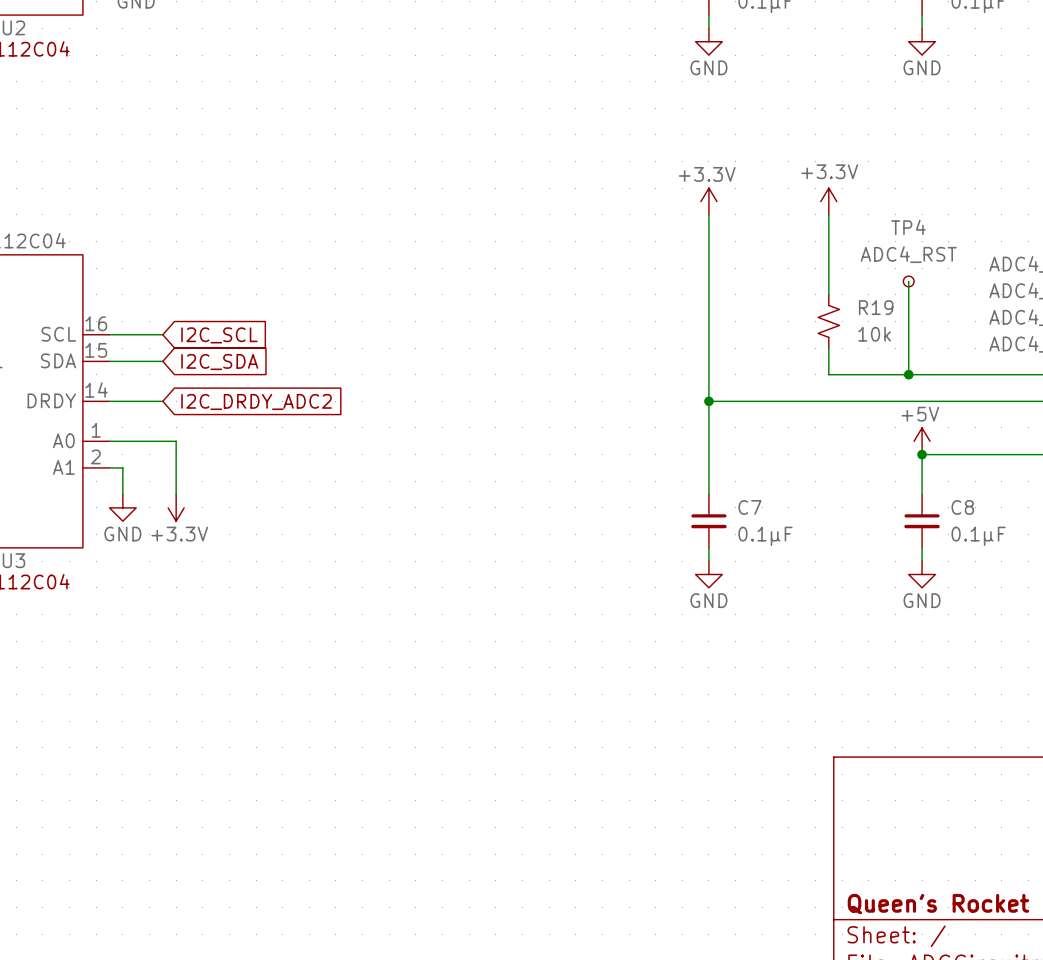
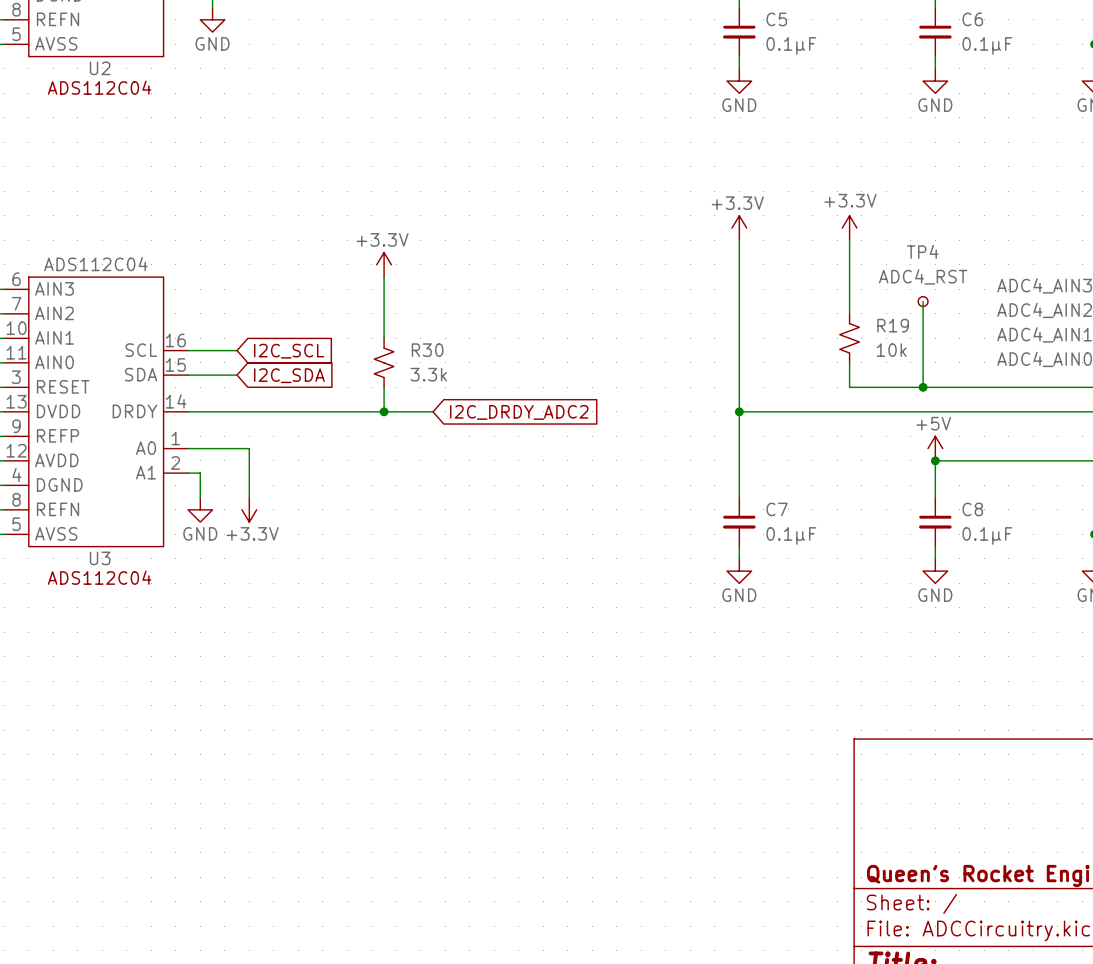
power symbol: none -> +3.3V (384, 264)
wire: none -> (384, 277) (384, 338)
R30: none -> 3.3k (384, 362)
wire: none -> (384, 387) (384, 411)
wire: none -> (237, 411) (433, 411)
global label position: I2C_DRDY_ADC2 (256, 401) -> I2C_DRDY_ADC2 (519, 412)
junction: none -> (384, 411)

